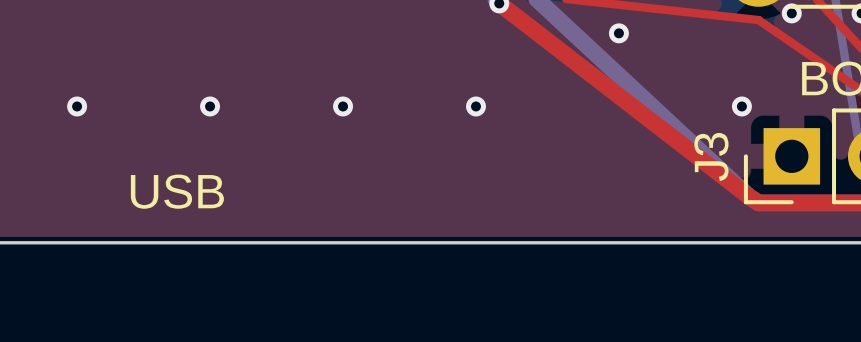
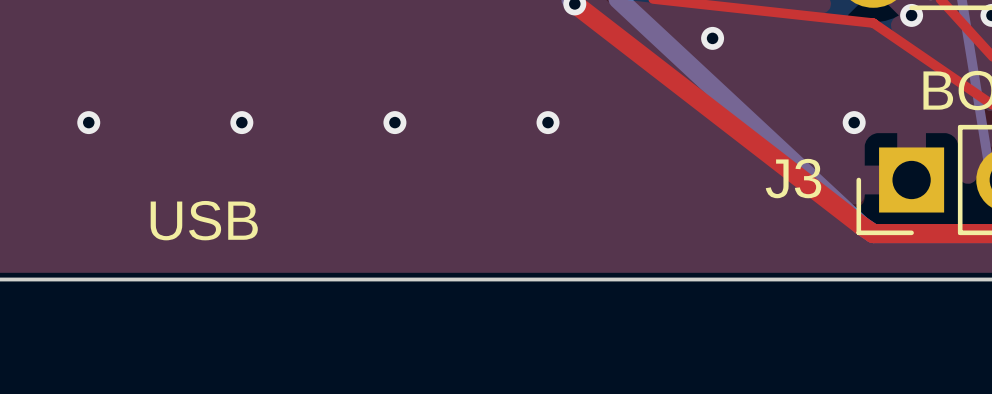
J3 name rotation: 0° (711, 157) -> 90° clockwise (793, 178)

